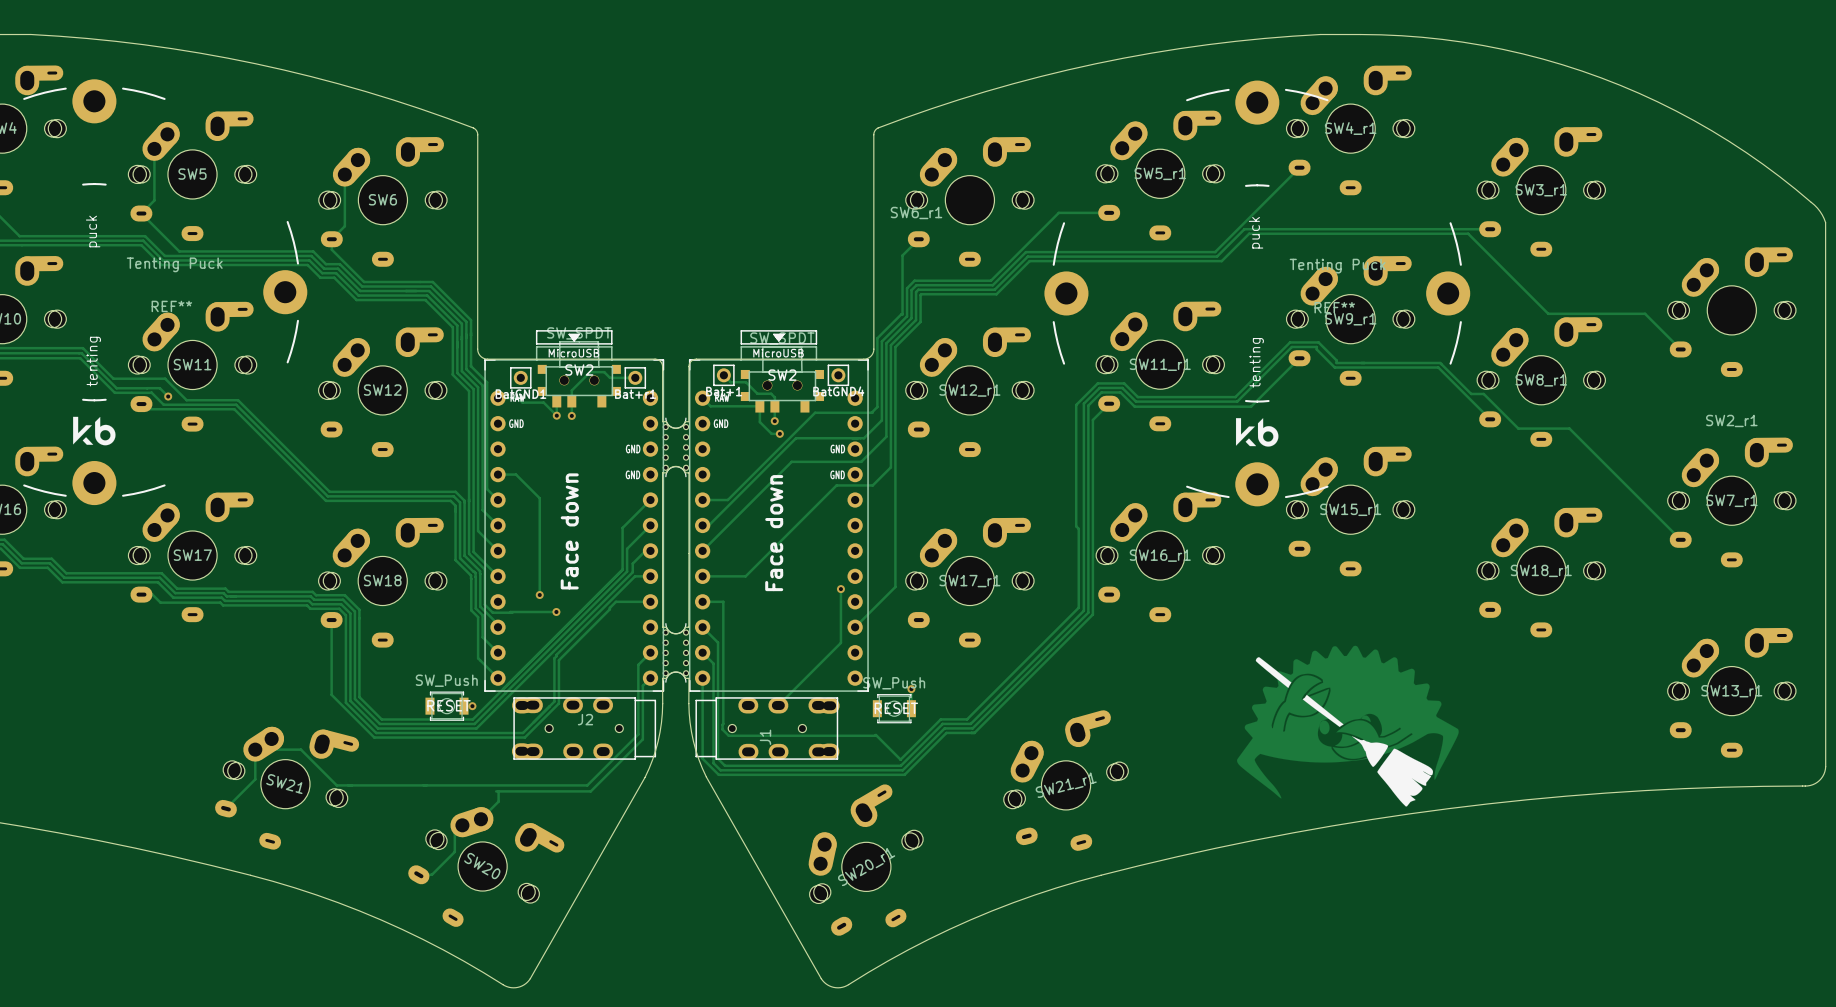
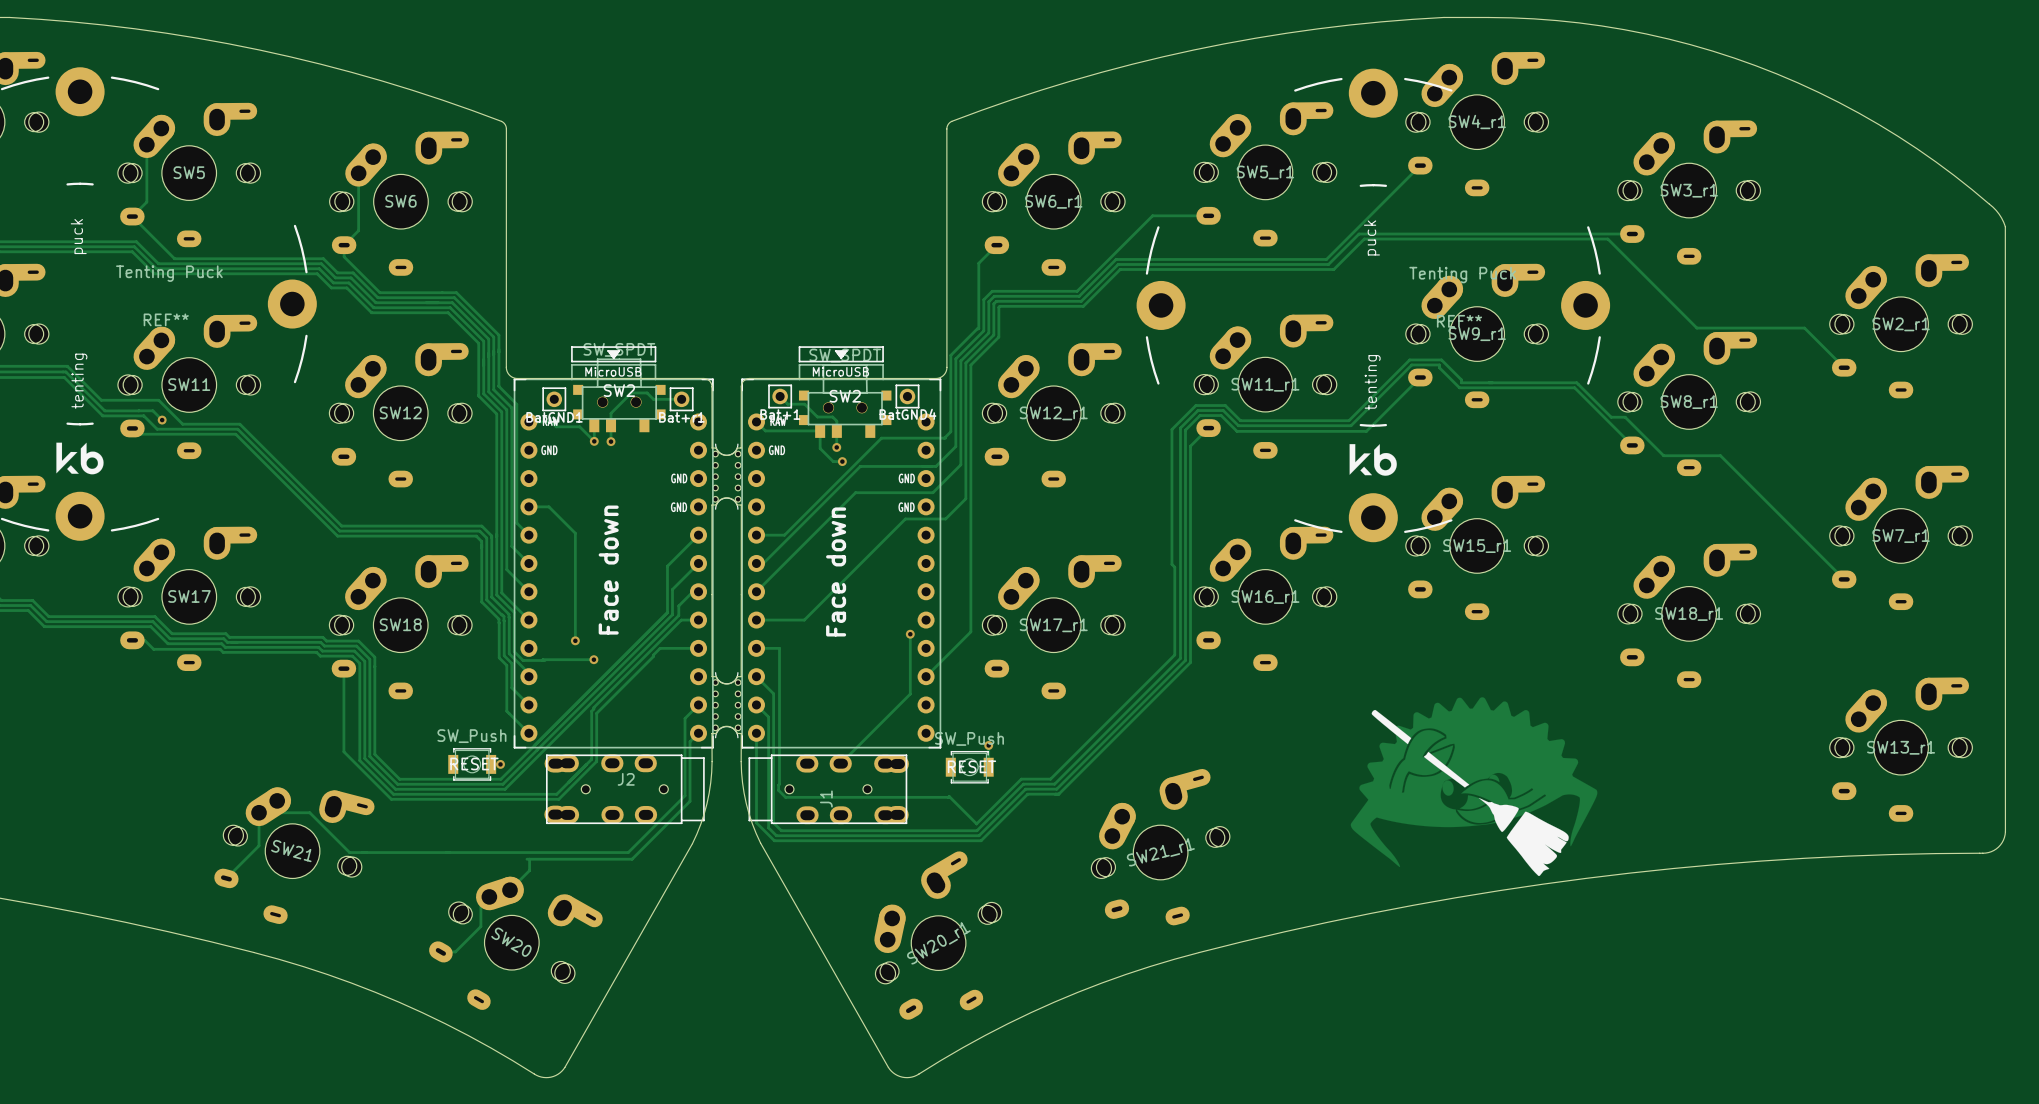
SW6_r1 name position: SW6_r1 (916, 212) -> SW6_r1 (1053, 201)
SW2_r1 name position: SW2_r1 (1731, 420) -> SW2_r1 (1901, 324)

